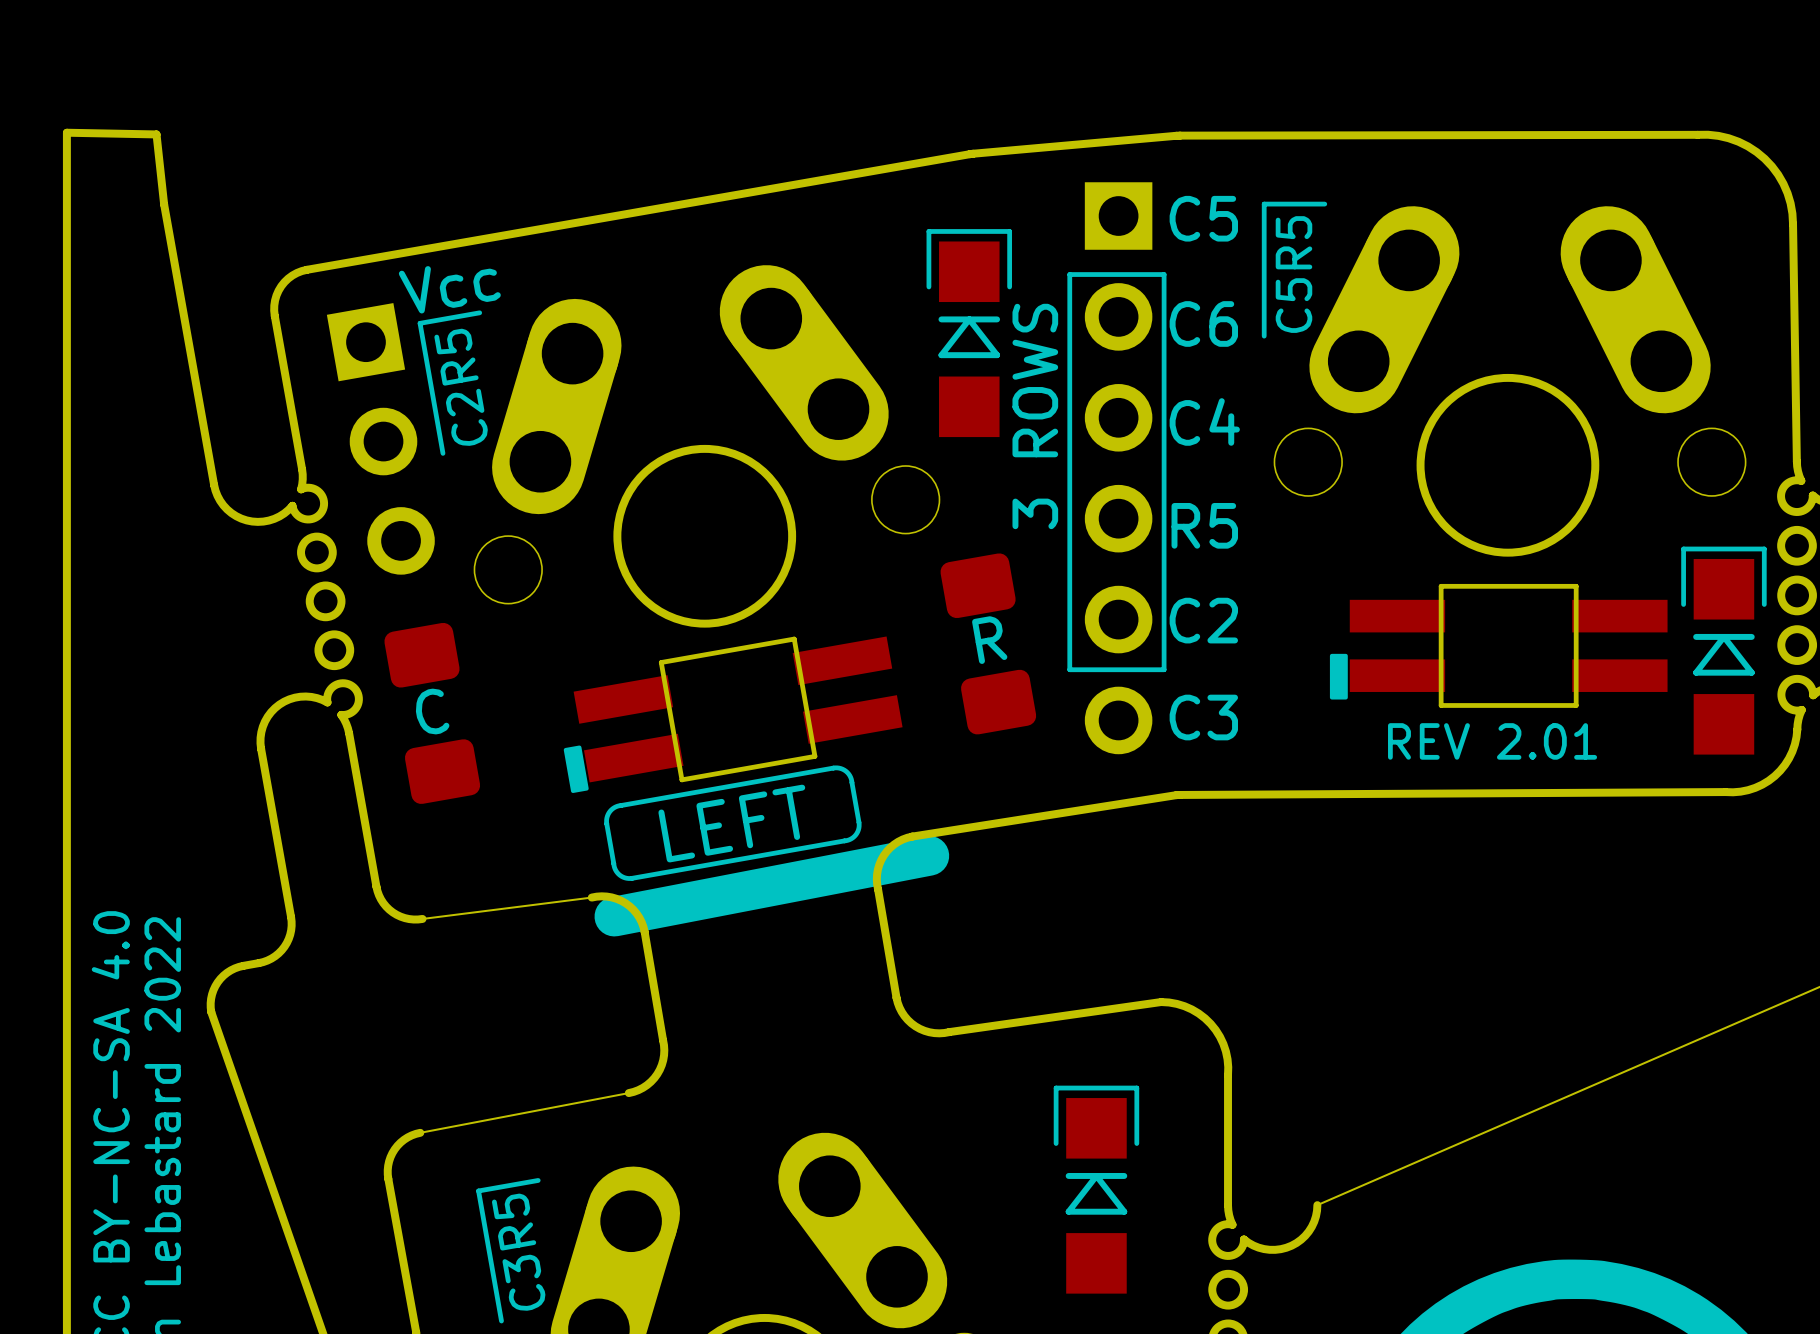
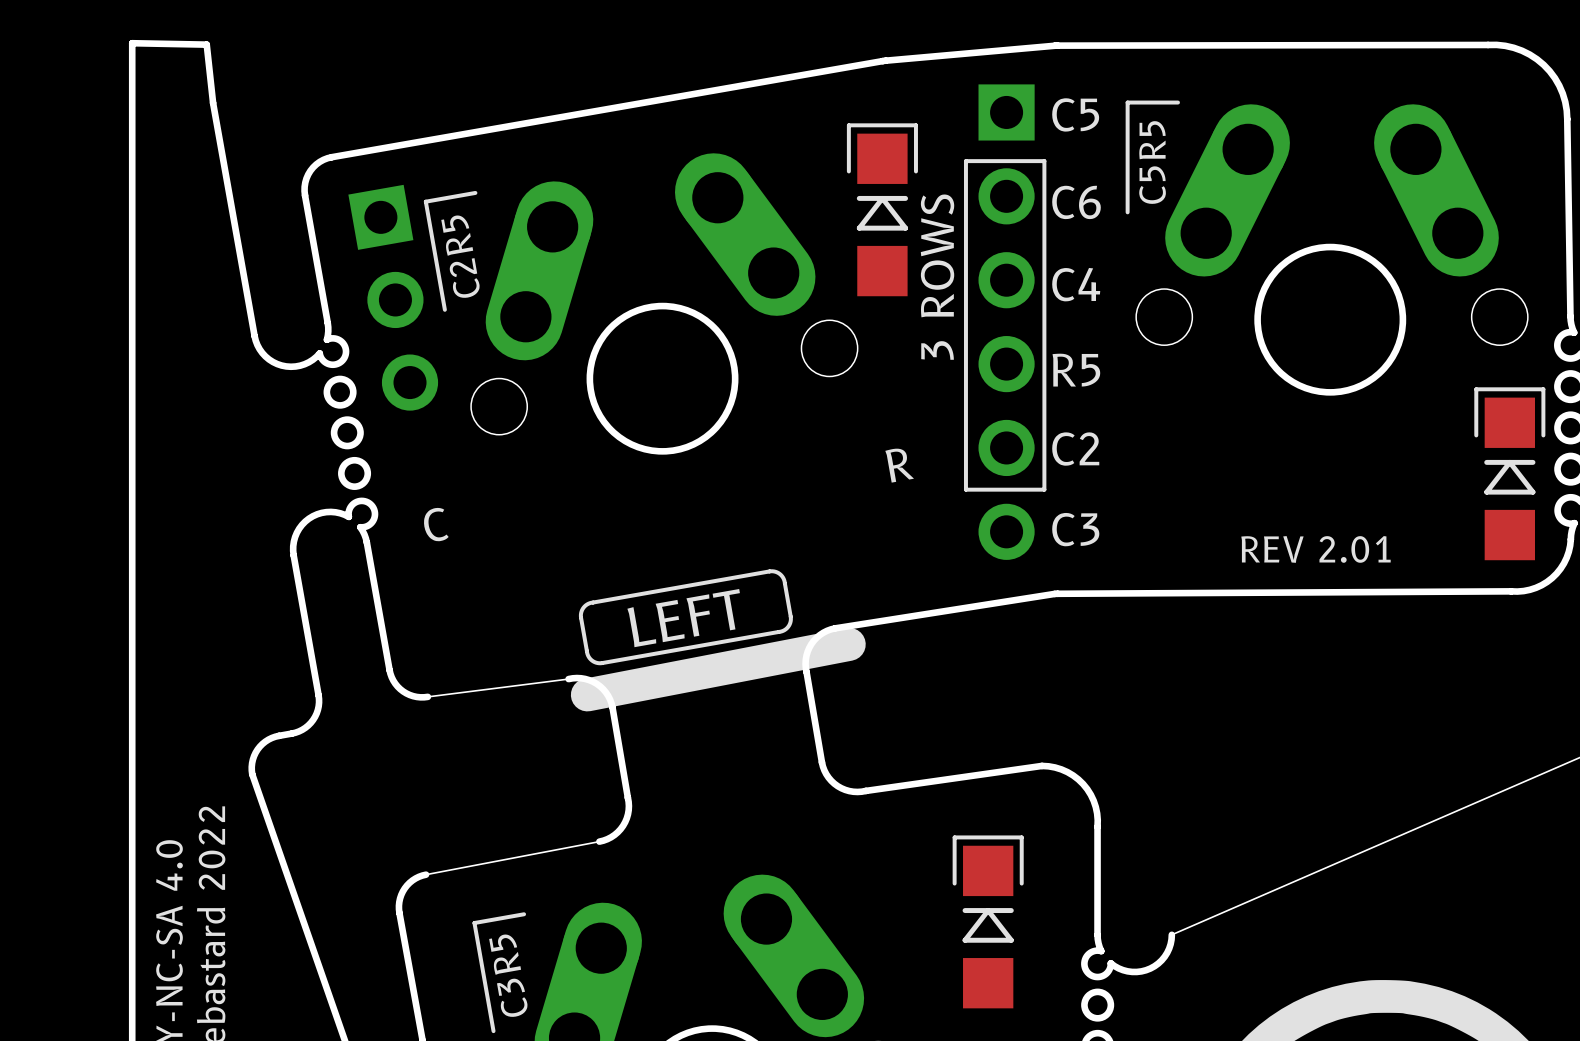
text: Vcc (449, 289) -> none
part: (988, 643) -> none
part: (1498, 645) -> none
part: (432, 713) -> none
part: (733, 714) -> none

